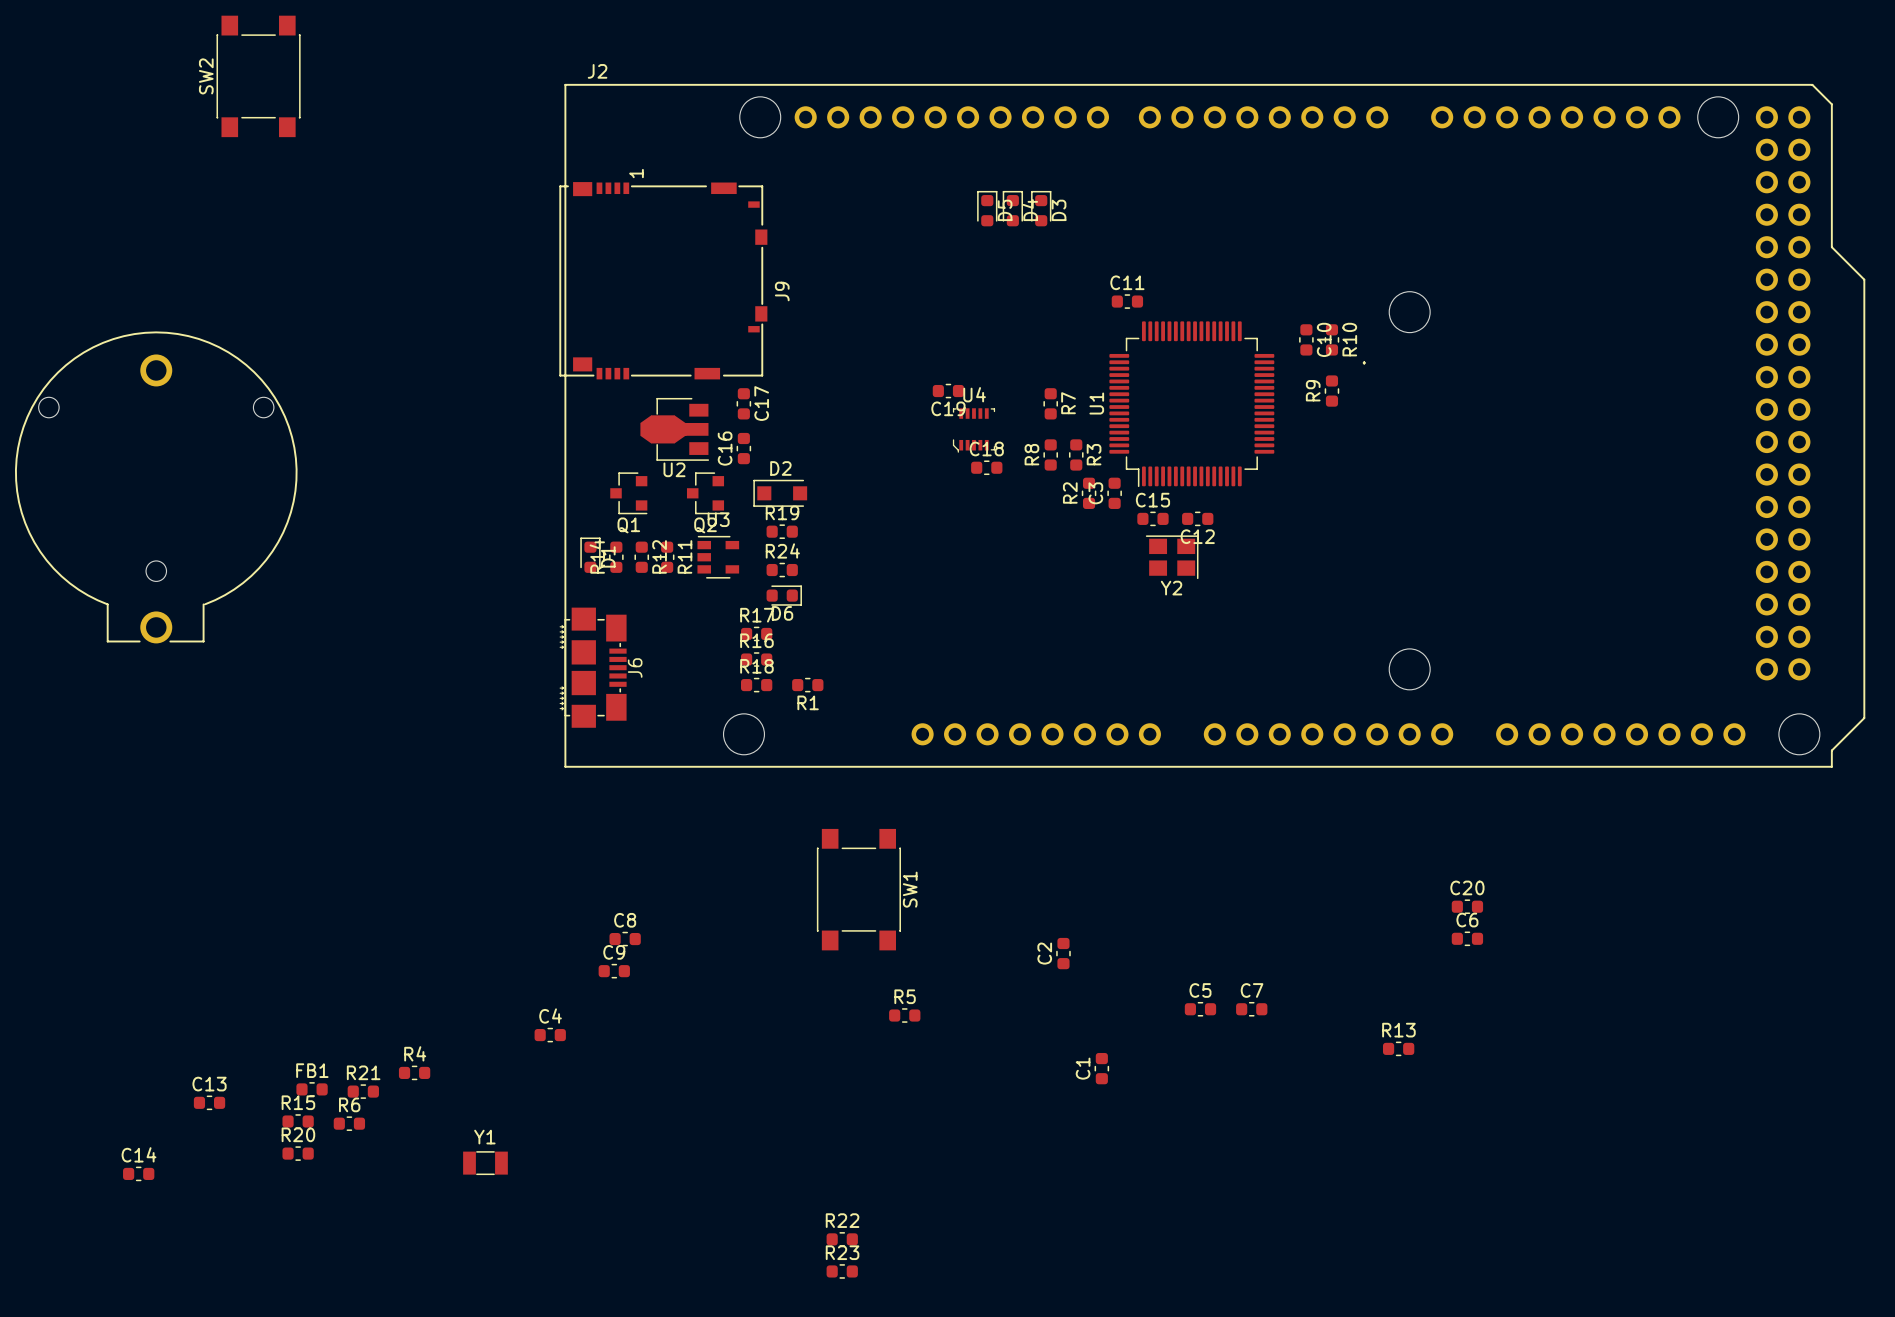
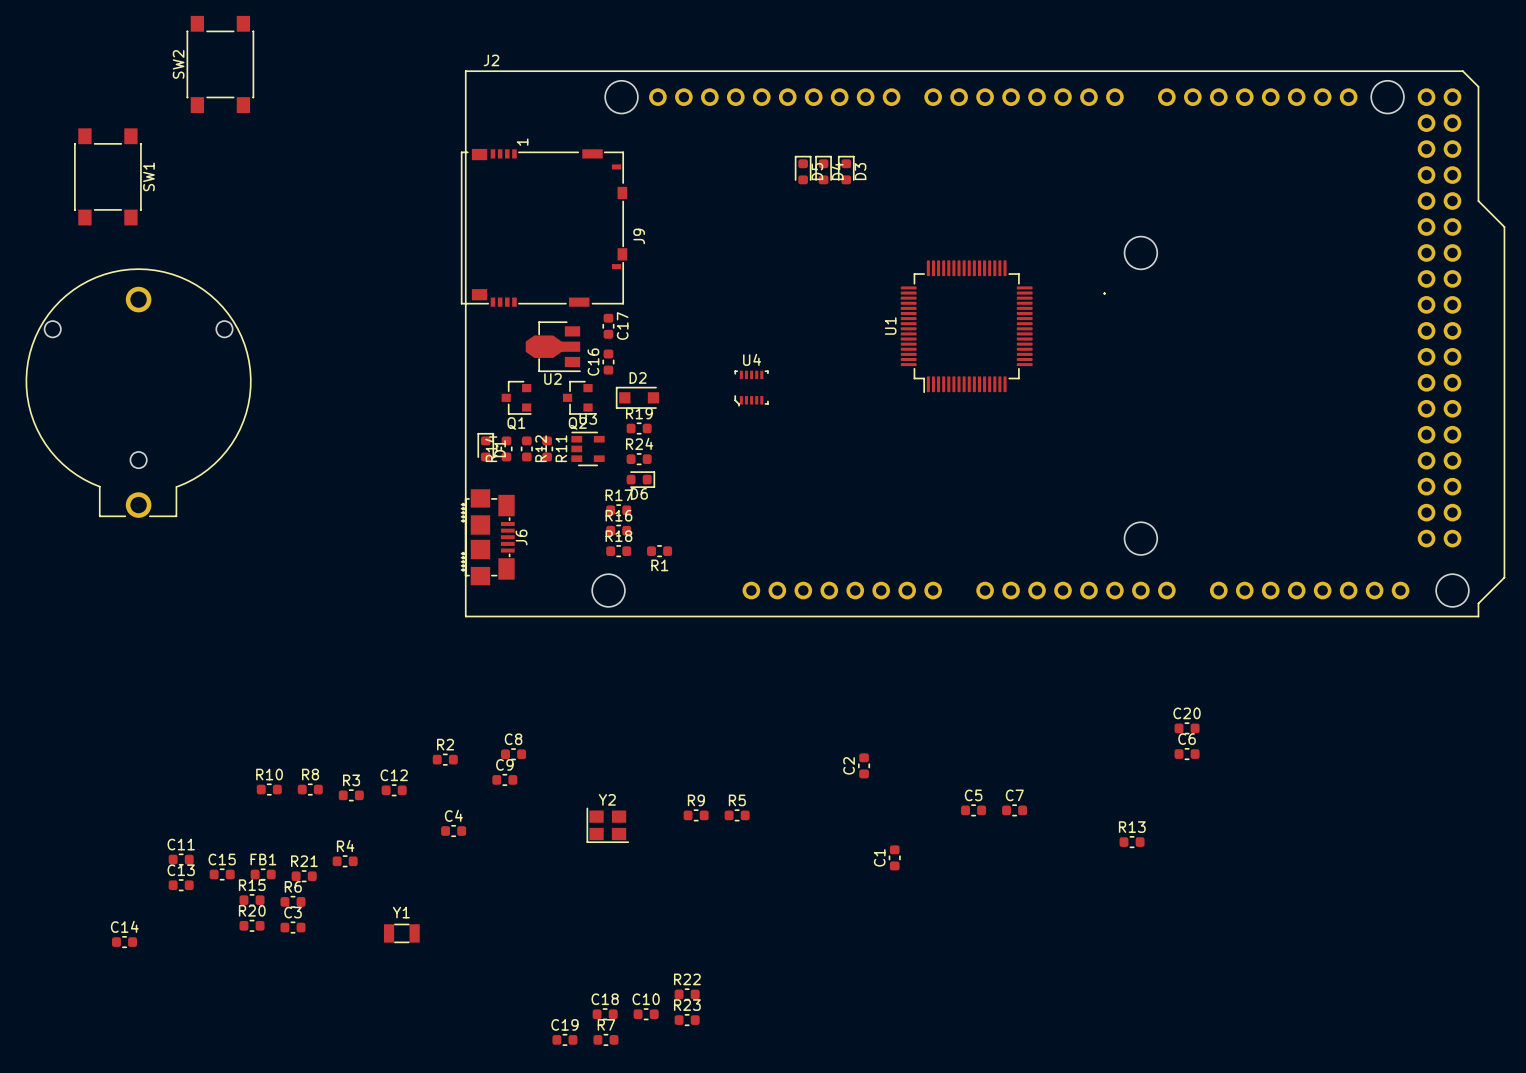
C11 position: (1127, 301) -> (181, 859)
C10 rotation: 0° (1306, 339) -> 90° clockwise (646, 1014)
C10 position: (1306, 339) -> (646, 1014)
C10 name position: C10 (1324, 339) -> C10 (646, 999)
R10 rotation: 0° (1331, 339) -> 90° clockwise (269, 789)
R10 position: (1331, 339) -> (269, 789)
R10 name position: R10 (1349, 339) -> R10 (269, 774)
C19 position: (948, 391) -> (564, 1039)
R9 rotation: 0° (1331, 391) -> 90° clockwise (696, 815)
R9 position: (1331, 391) -> (696, 815)
R7 rotation: 0° (1050, 403) -> 90° clockwise (605, 1039)
R7 position: (1050, 403) -> (605, 1039)
R7 name position: R7 (1068, 403) -> R7 (606, 1024)
C19 name position: C19 (948, 408) -> C19 (564, 1024)
U4 position: (973, 430) -> (751, 388)
R8 rotation: 0° (1050, 454) -> 90° clockwise (310, 789)
R8 position: (1050, 454) -> (310, 789)
R3 rotation: 0° (1076, 454) -> 90° clockwise (351, 795)
R3 position: (1076, 454) -> (351, 795)
R3 name position: R3 (1094, 454) -> R3 (351, 780)
C18 position: (986, 467) -> (605, 1014)
R2 rotation: 0° (1089, 493) -> 90° clockwise (445, 759)
R2 position: (1089, 493) -> (445, 759)
C3 rotation: 0° (1114, 493) -> 90° clockwise (293, 927)
C3 position: (1114, 493) -> (293, 927)
C15 position: (1152, 518) -> (222, 874)
C12 position: (1197, 518) -> (394, 790)
C12 name position: C12 (1197, 536) -> C12 (394, 775)
Y2 rotation: 0° (1172, 557) -> 180° (607, 825)
Y2 position: (1172, 557) -> (607, 825)
SW1 position: (858, 889) -> (107, 176)

